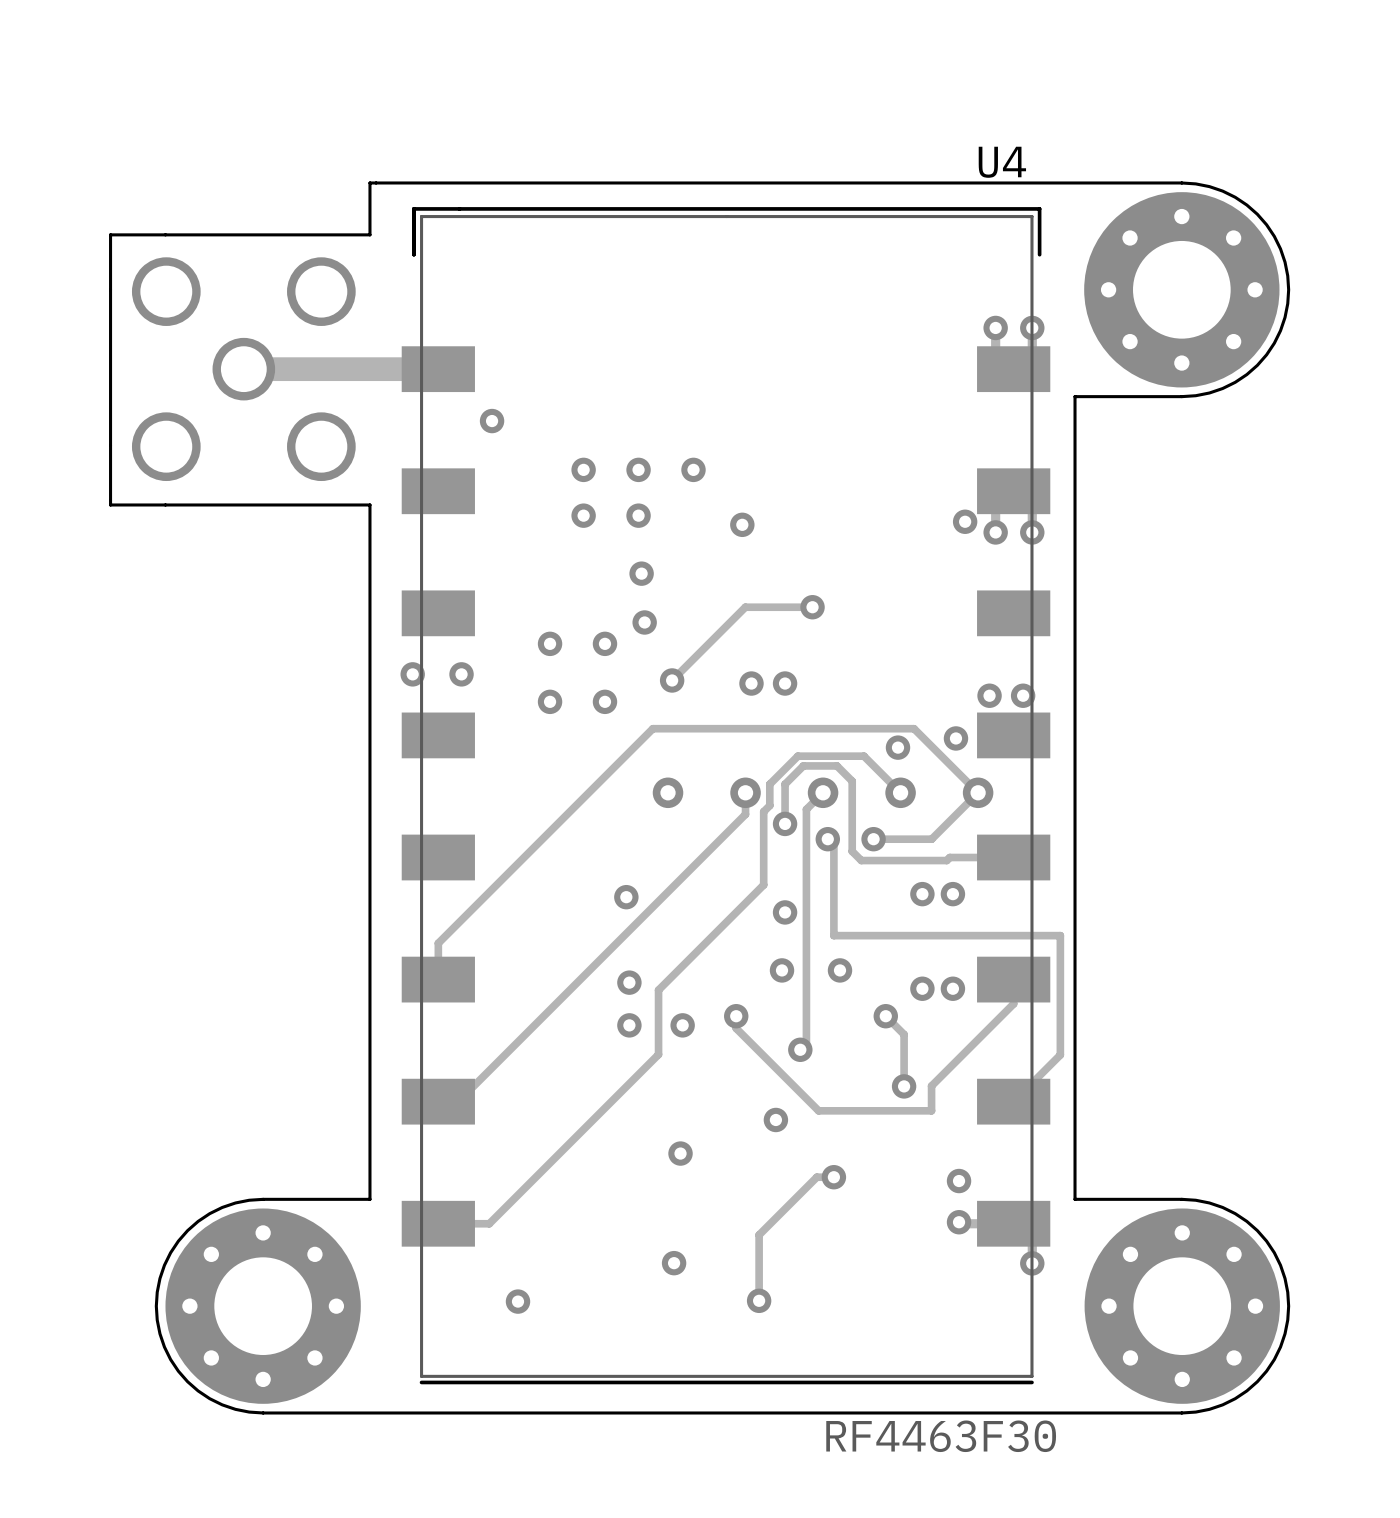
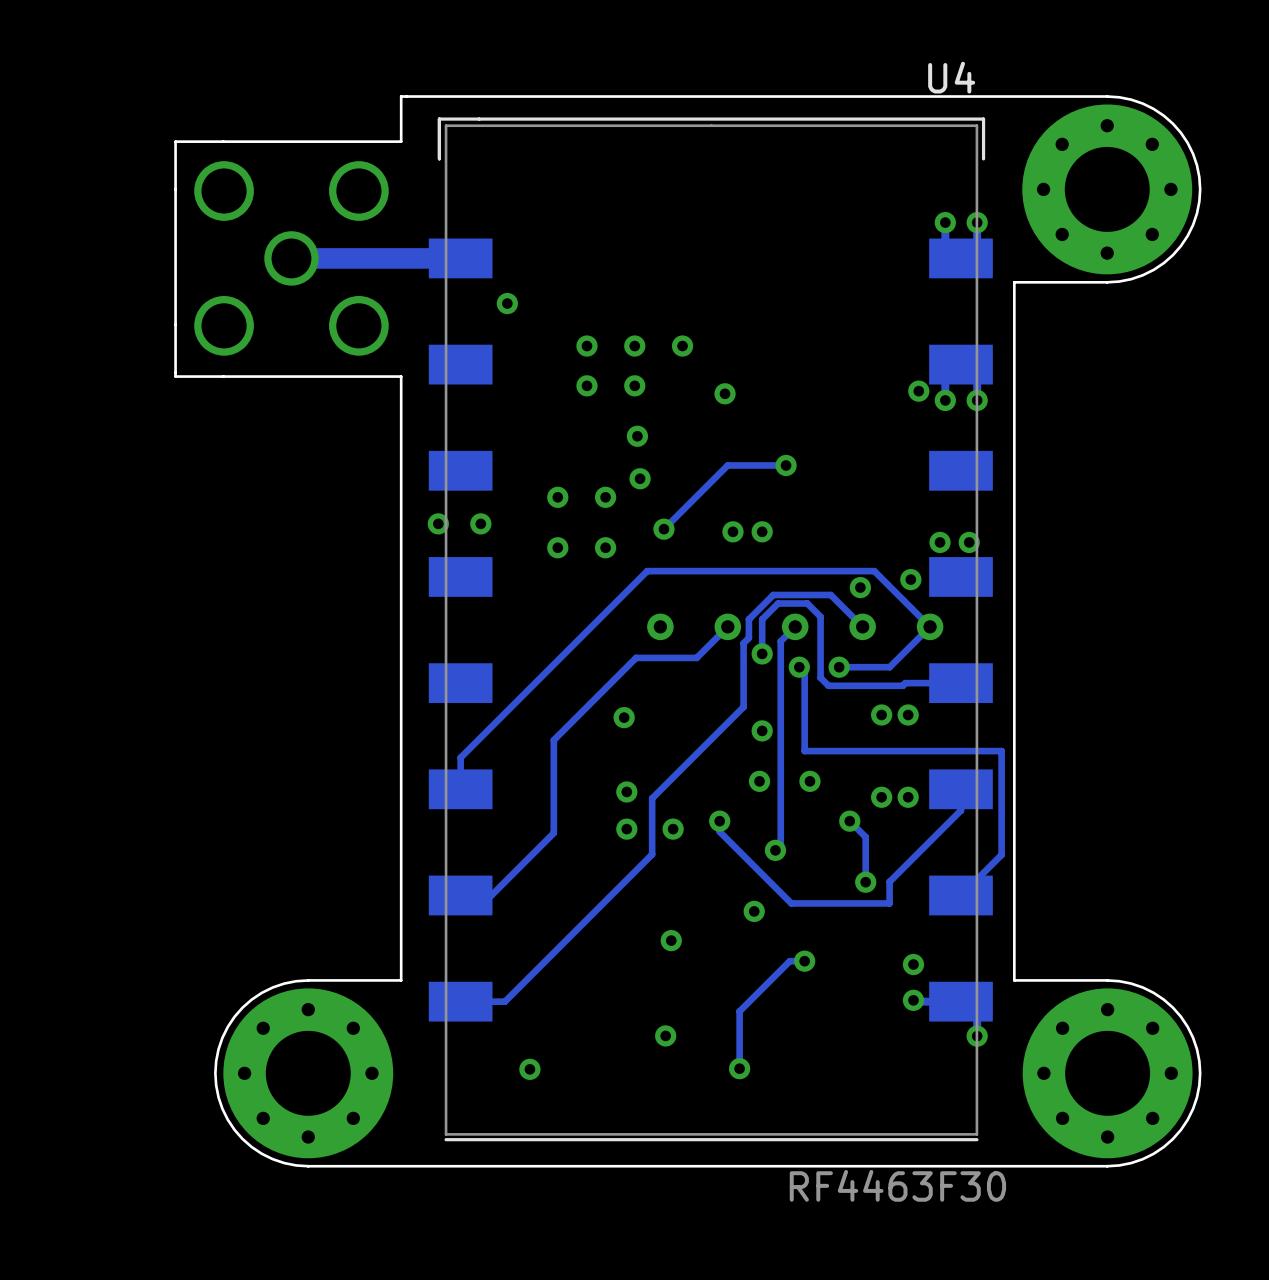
track: (745, 792) (745, 814) (458, 1101) -> (727, 626) (696, 657) (636, 657) (553, 740) (553, 833) (491, 895) (460, 895)

